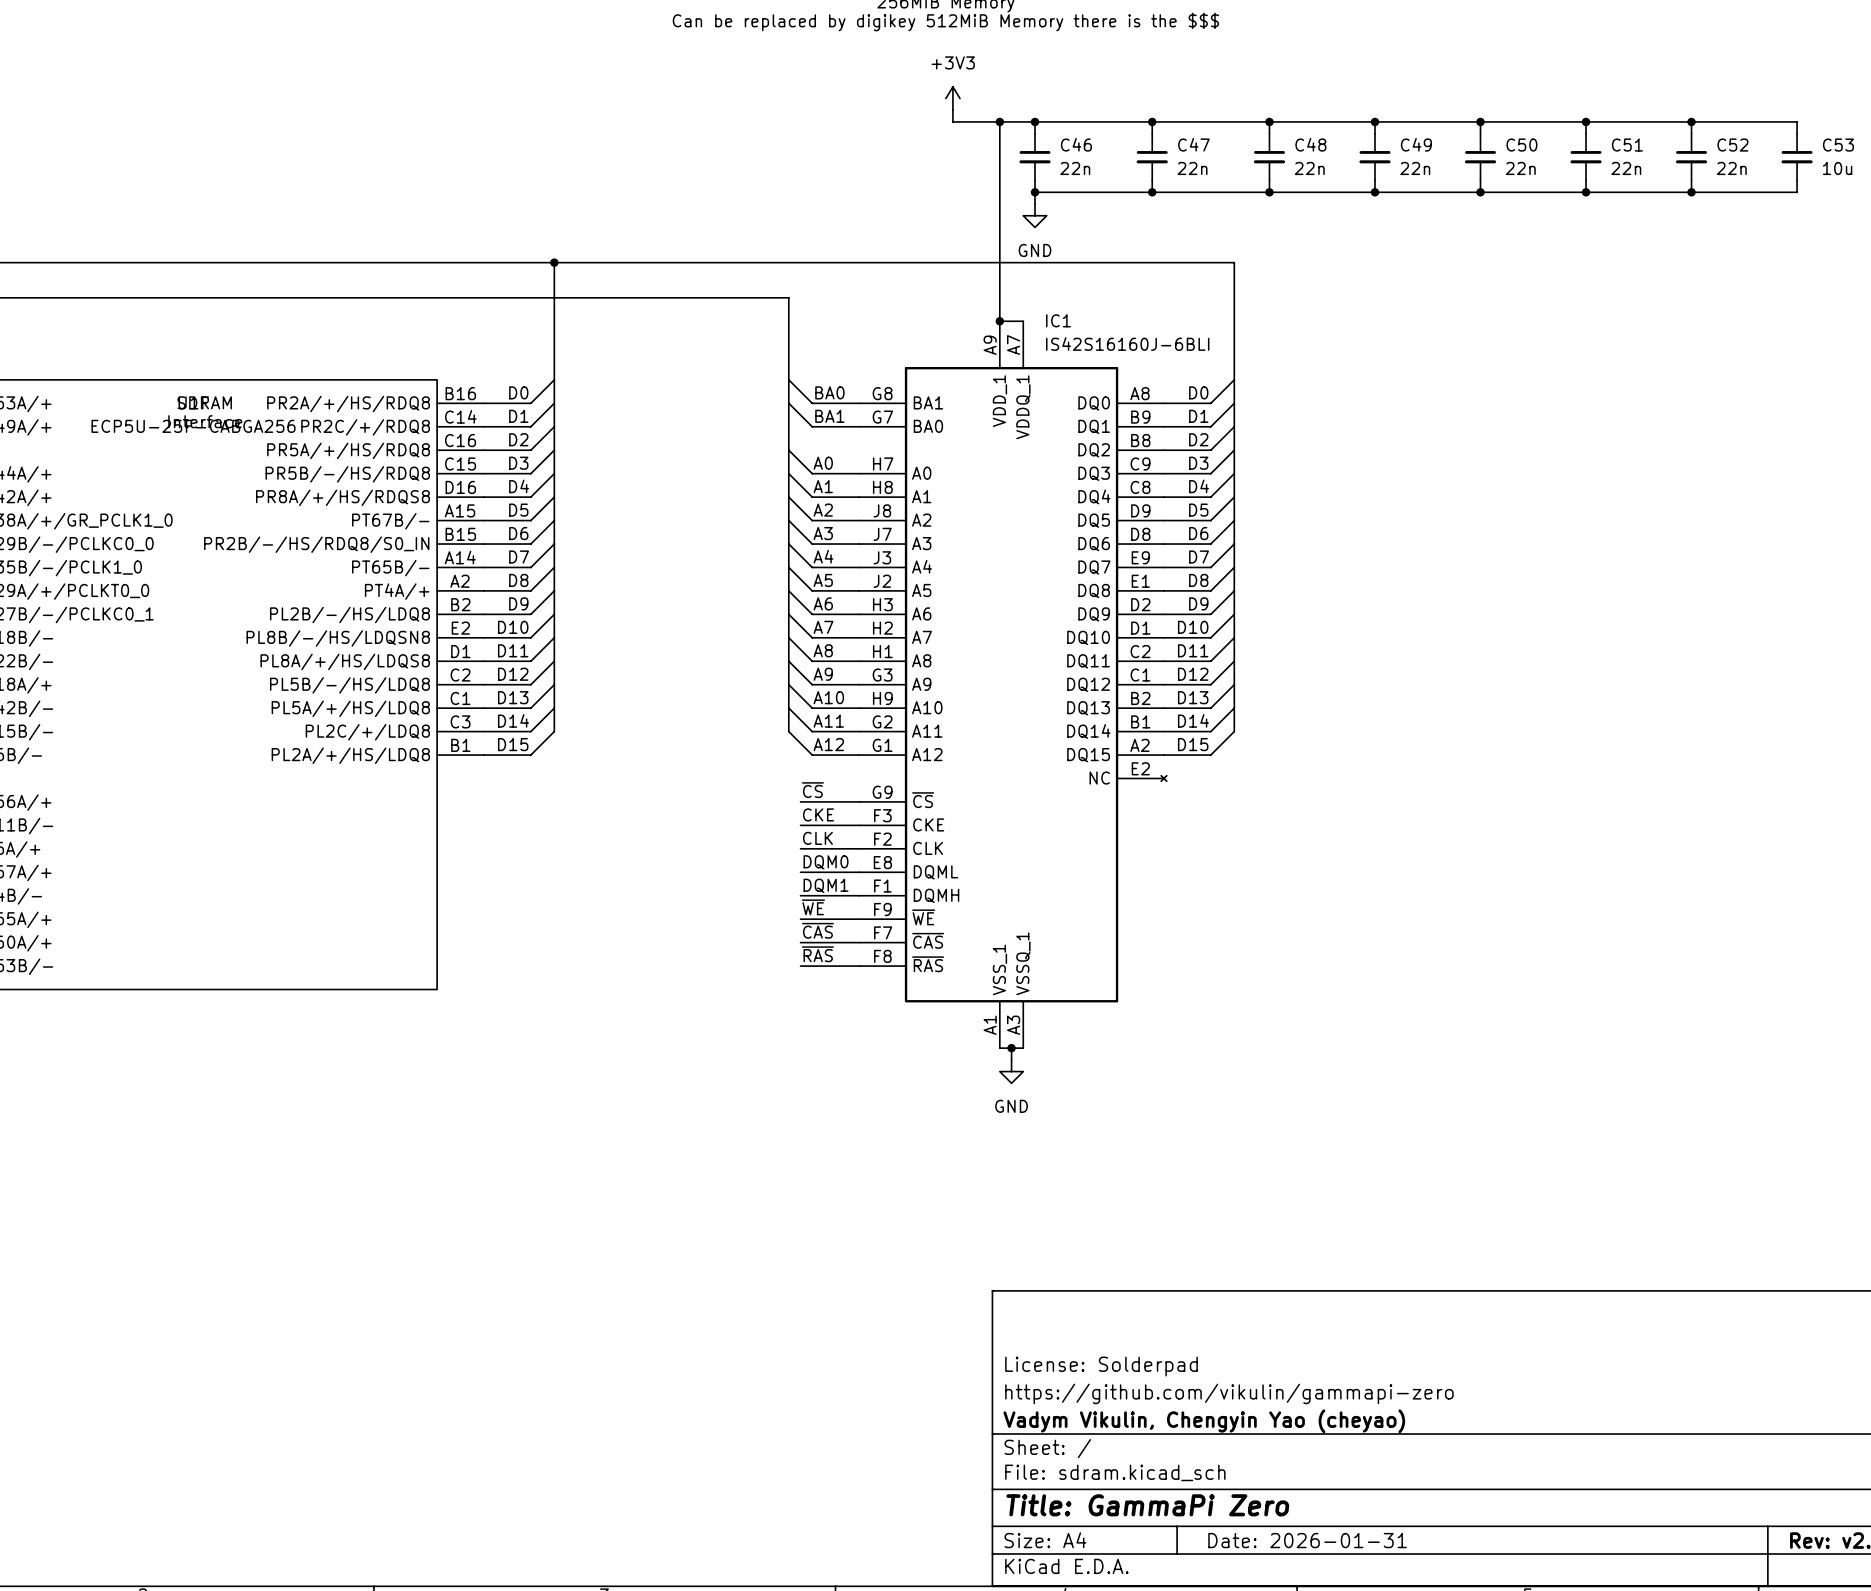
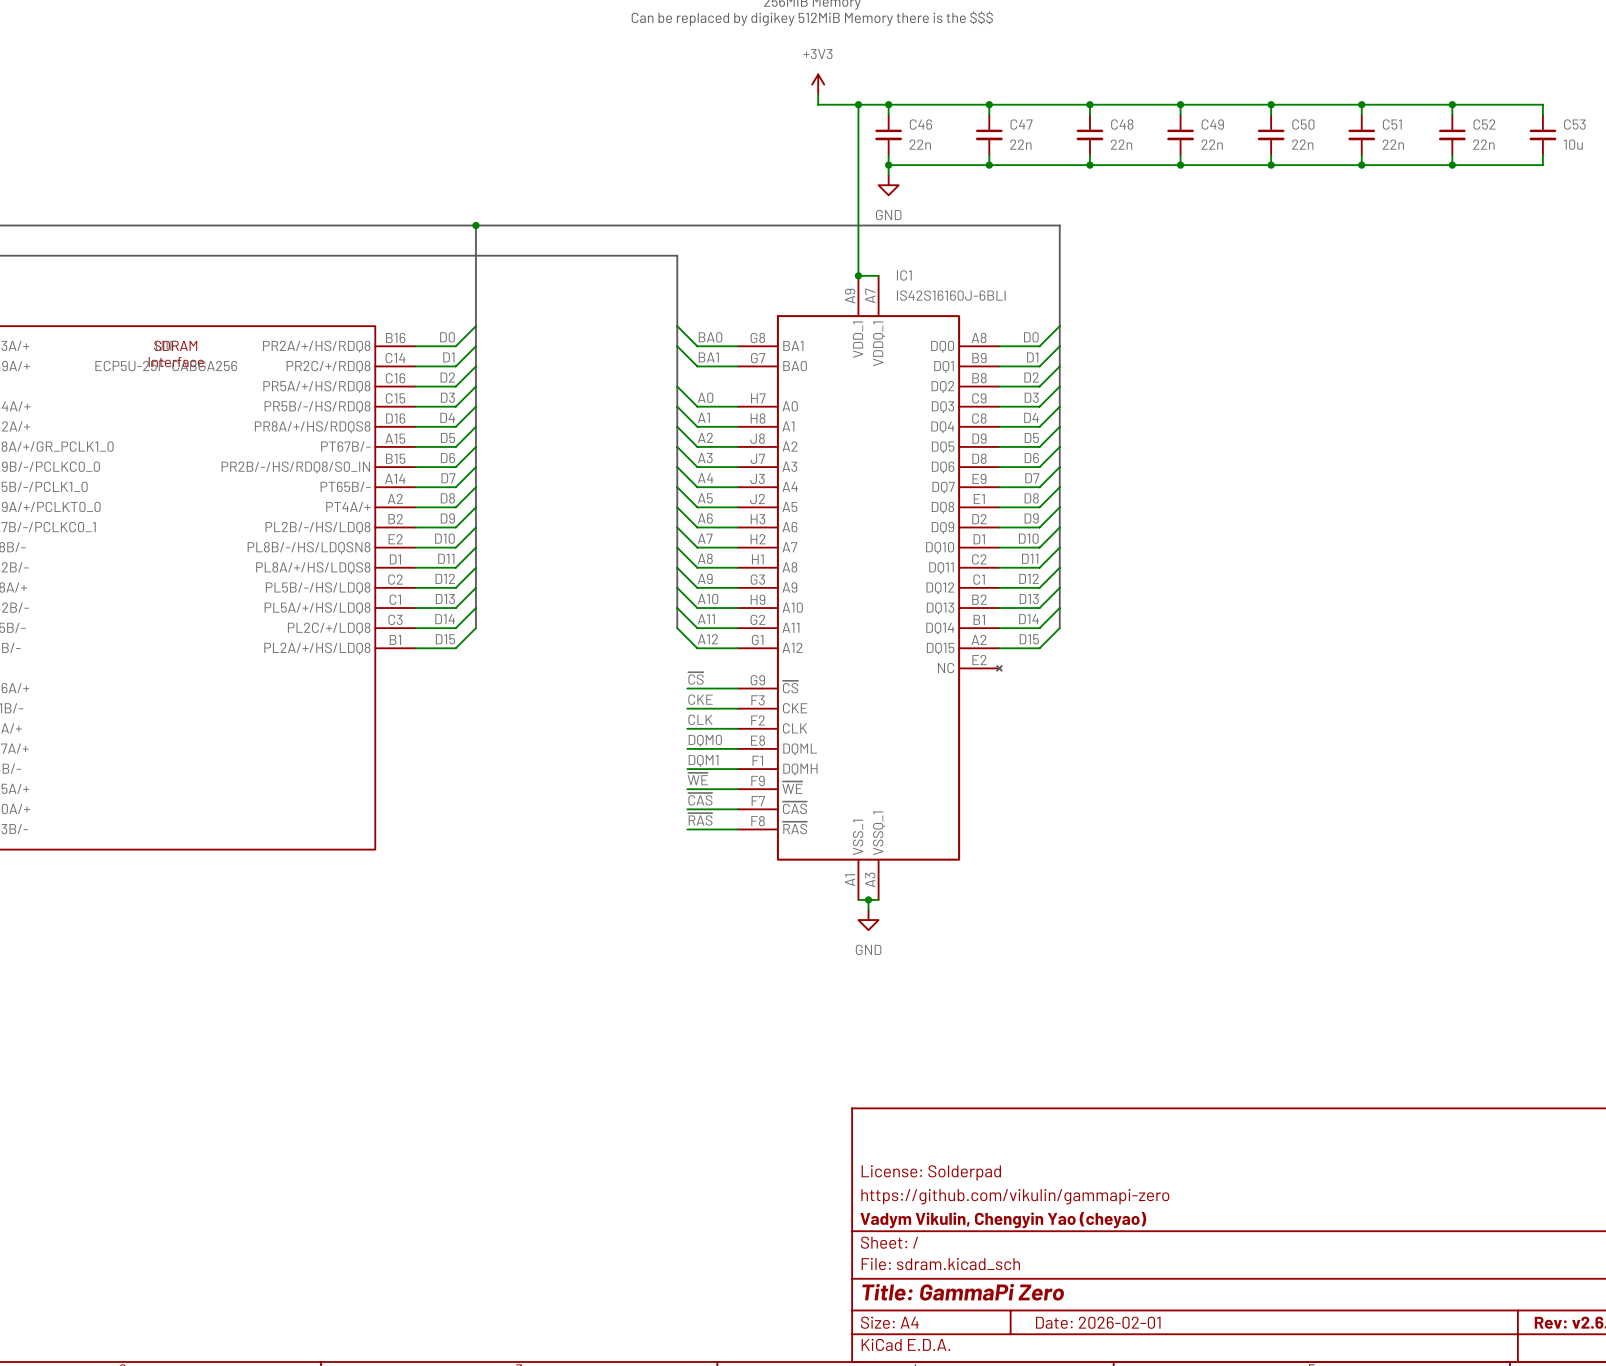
title block: Date: 2026-01-31 (1307, 1540) -> Date: 2026-02-01 (1098, 1322)

